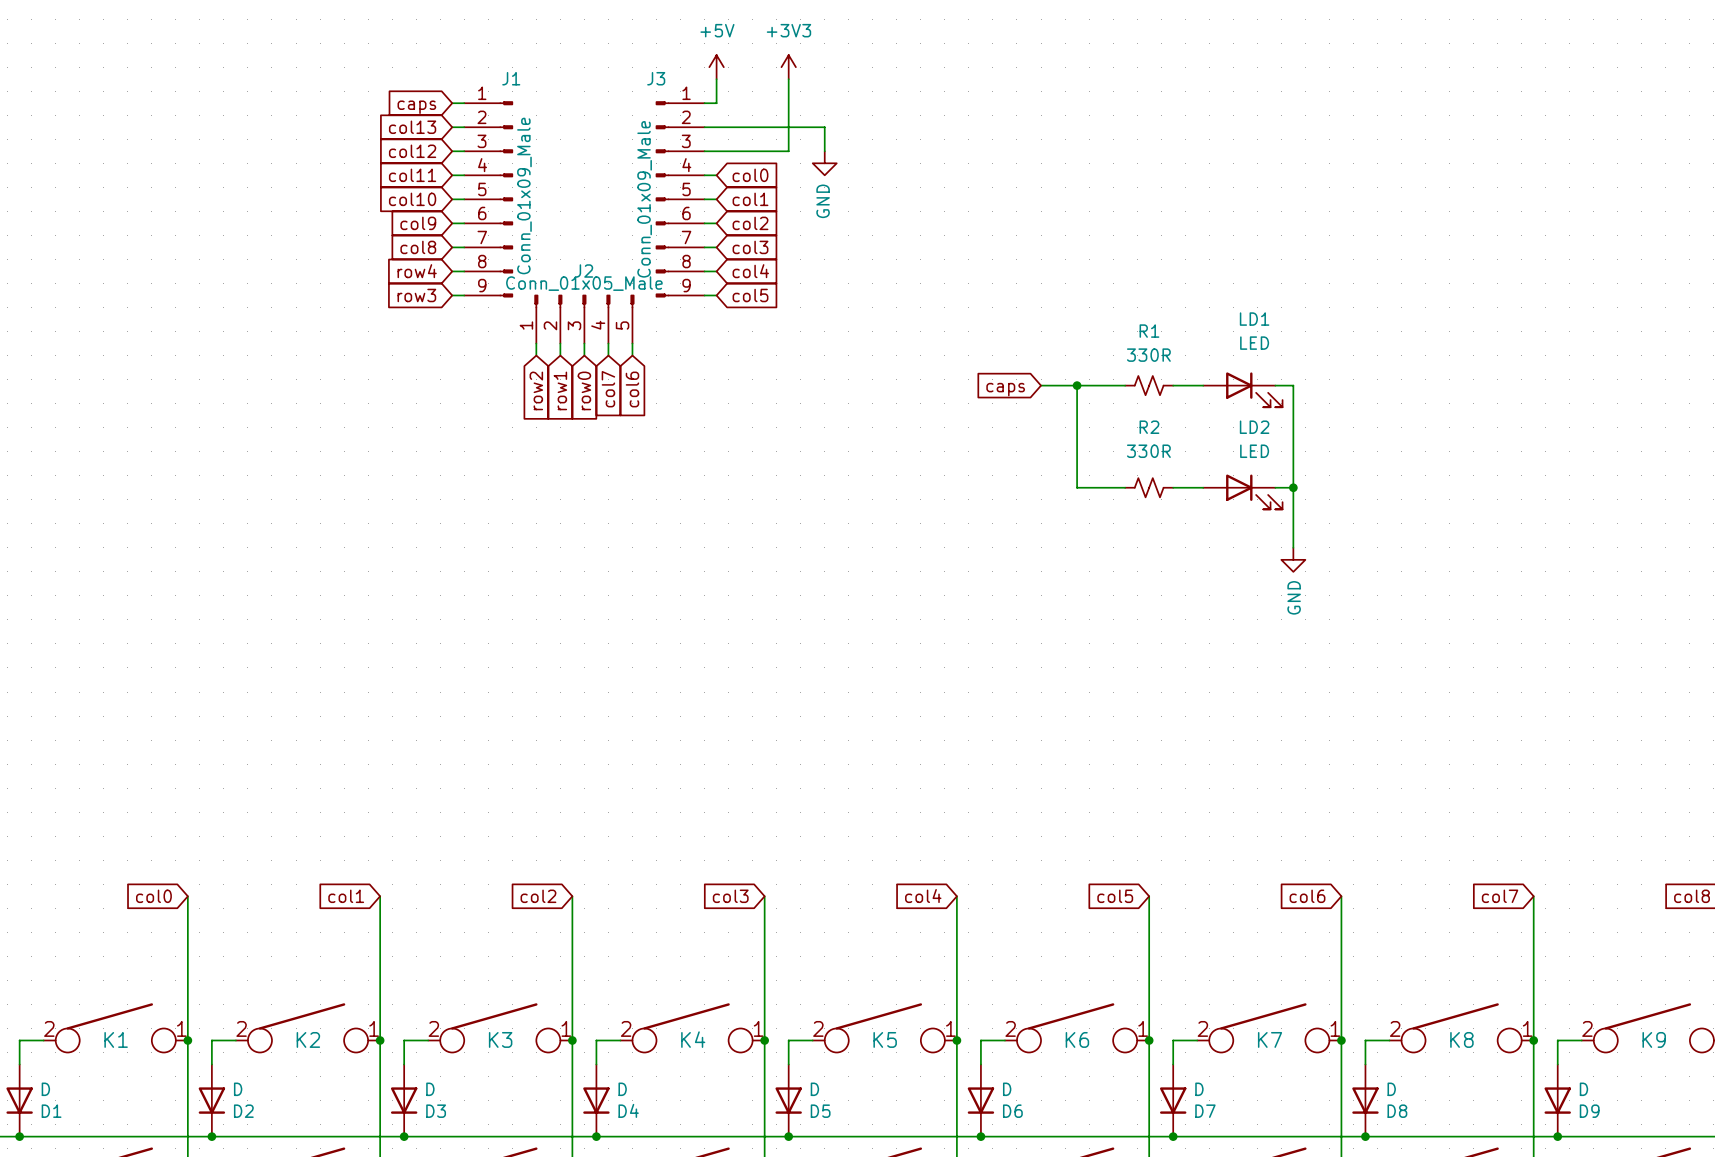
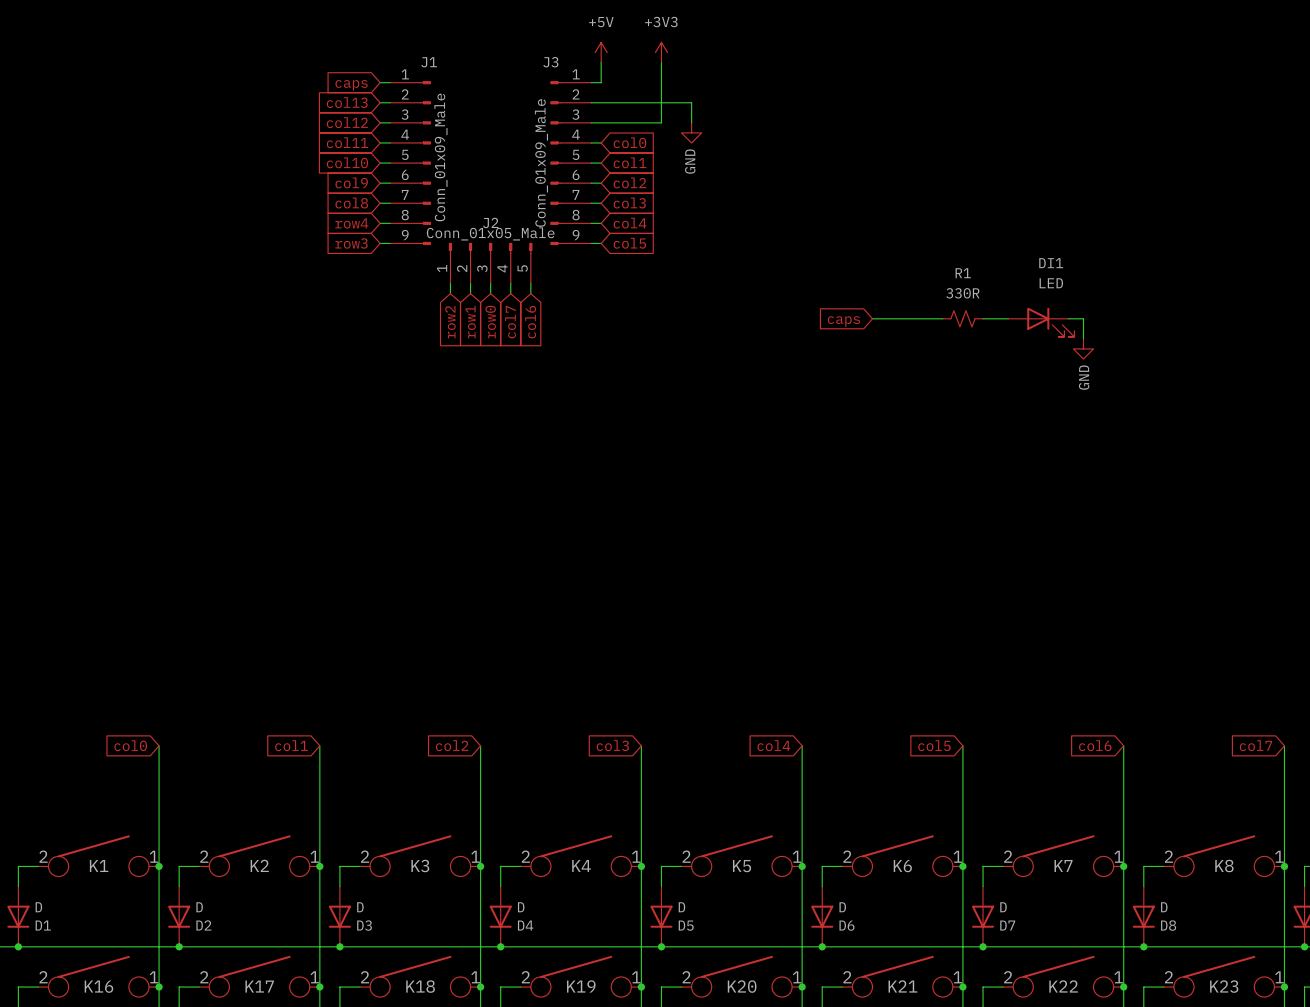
LD1 name: LD1 (1254, 319) -> DI1 (1051, 263)
wire: (1077, 385) (1077, 487) (1125, 487) -> none
junction: (1077, 385) -> none
wire: (1293, 409) (1293, 547) -> none
R2: 330R (1149, 487) -> none
wire: (1173, 487) (1203, 487) -> none
wire: (1275, 487) (1293, 487) -> none
junction: (1293, 487) -> none
LD2: LED (1242, 491) -> none
power symbol position: GND (1293, 559) -> GND (1083, 348)

